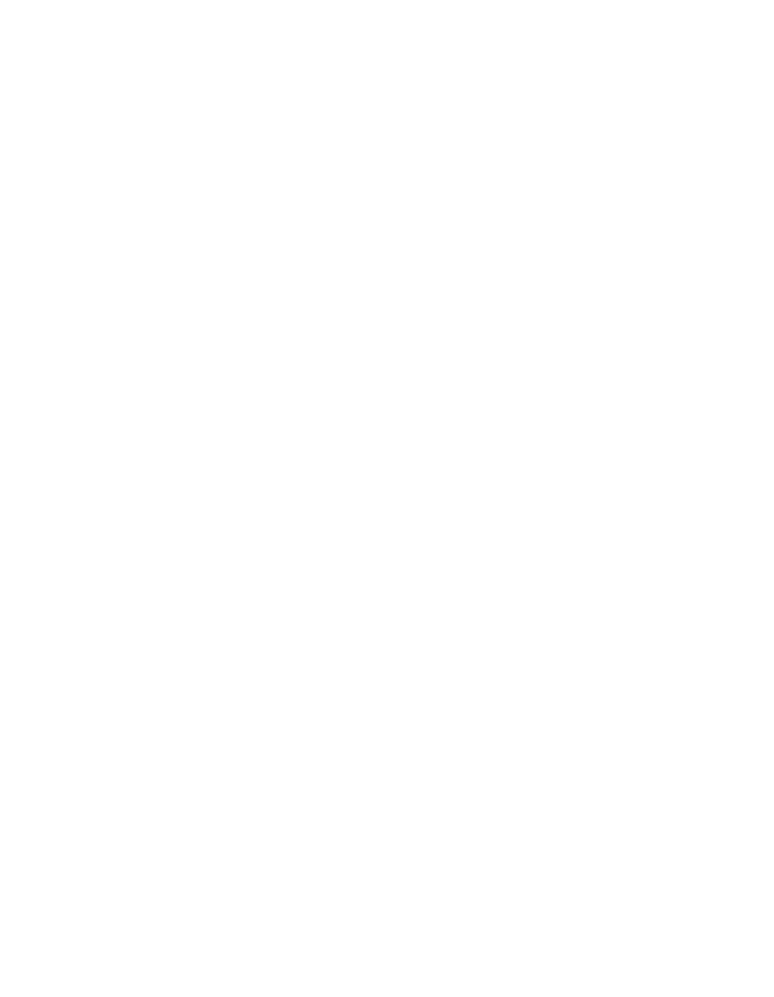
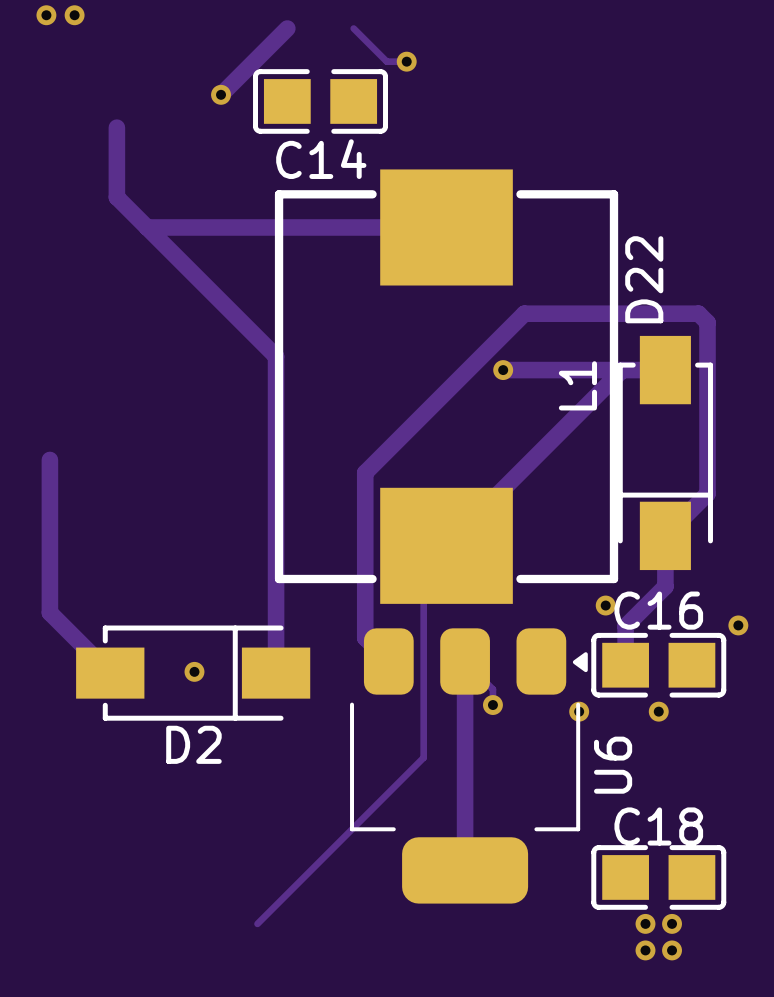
via: none -> (46, 15)
via: none -> (74, 15)
track: none -> (287, 28) (221, 94)
track: none -> (353, 28) (386, 61) (406, 61)
via: none -> (406, 61)
via: none -> (221, 94)
C14: none -> (320, 101)
track: none -> (116, 127) (116, 197) (276, 356) (276, 673)
track: none -> (147, 227) (446, 227)
track: none -> (503, 370) (665, 370)
via: none -> (503, 370)
track: none -> (622, 370) (423, 568) (423, 757) (257, 923)
L1: none -> (446, 386)
D22: none -> (665, 452)
track: none -> (49, 459) (49, 612) (110, 673)
track: none -> (665, 527) (665, 586) (625, 626) (625, 665)
track: none -> (665, 535) (707, 493) (707, 322) (698, 313) (524, 313) (365, 472) (365, 637) (388, 661) (372, 661)
via: none -> (605, 605)
via: none -> (738, 625)
C16: none -> (658, 665)
via: none -> (194, 671)
D2: none -> (193, 673)
track: none -> (492, 705) (492, 689) (465, 661) (465, 870) (459, 865)
via: none -> (492, 705)
via: none -> (579, 711)
via: none -> (658, 711)
U6: none -> (468, 765)
C18: none -> (658, 877)
via: none -> (645, 923)
via: none -> (672, 923)
via: none -> (645, 950)
via: none -> (672, 950)

